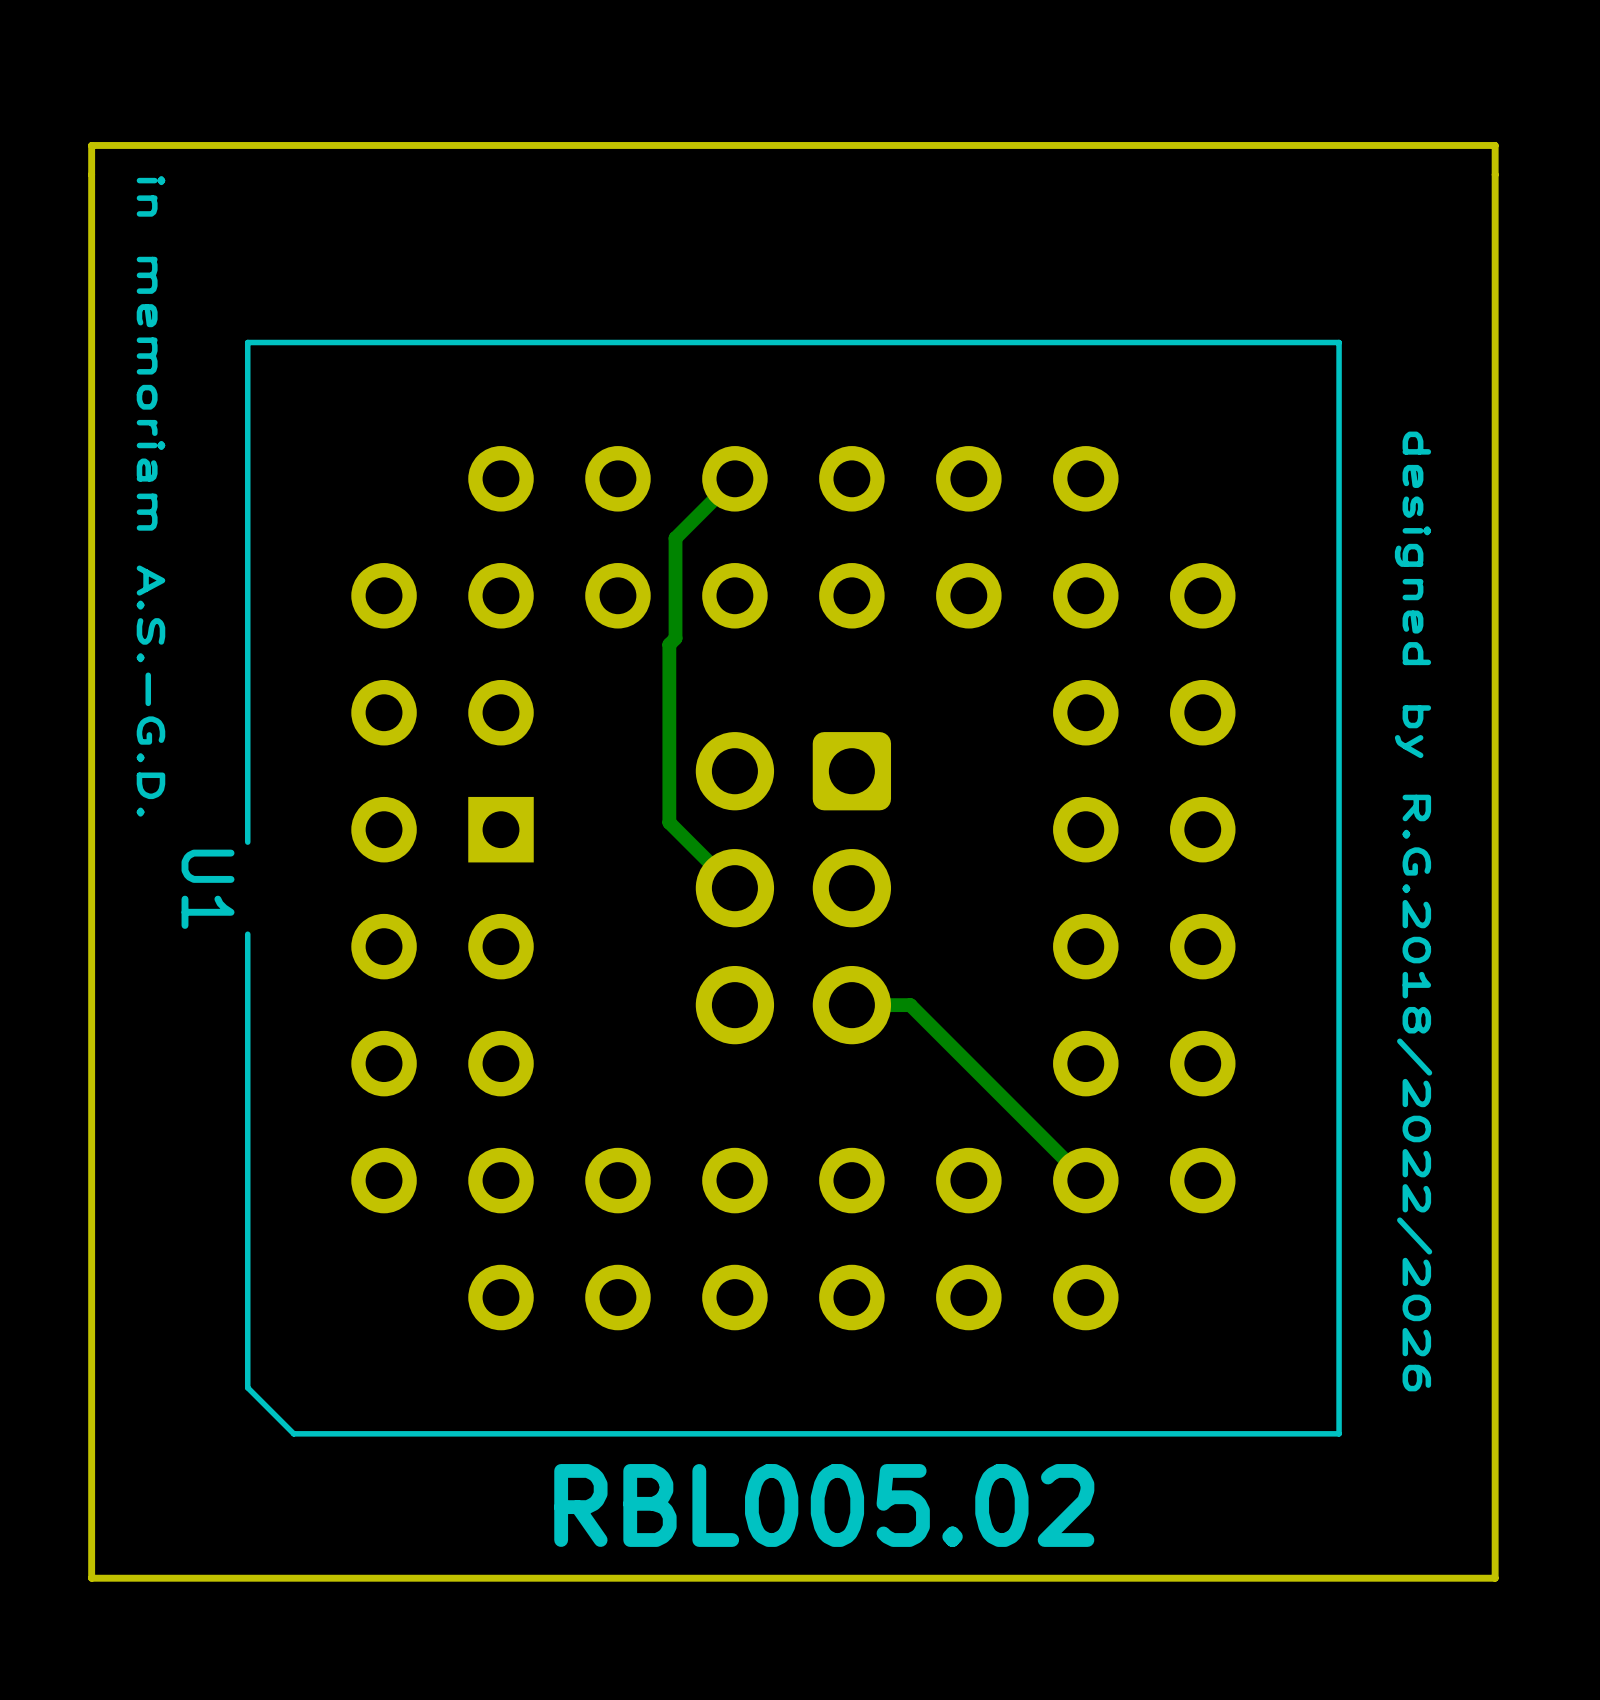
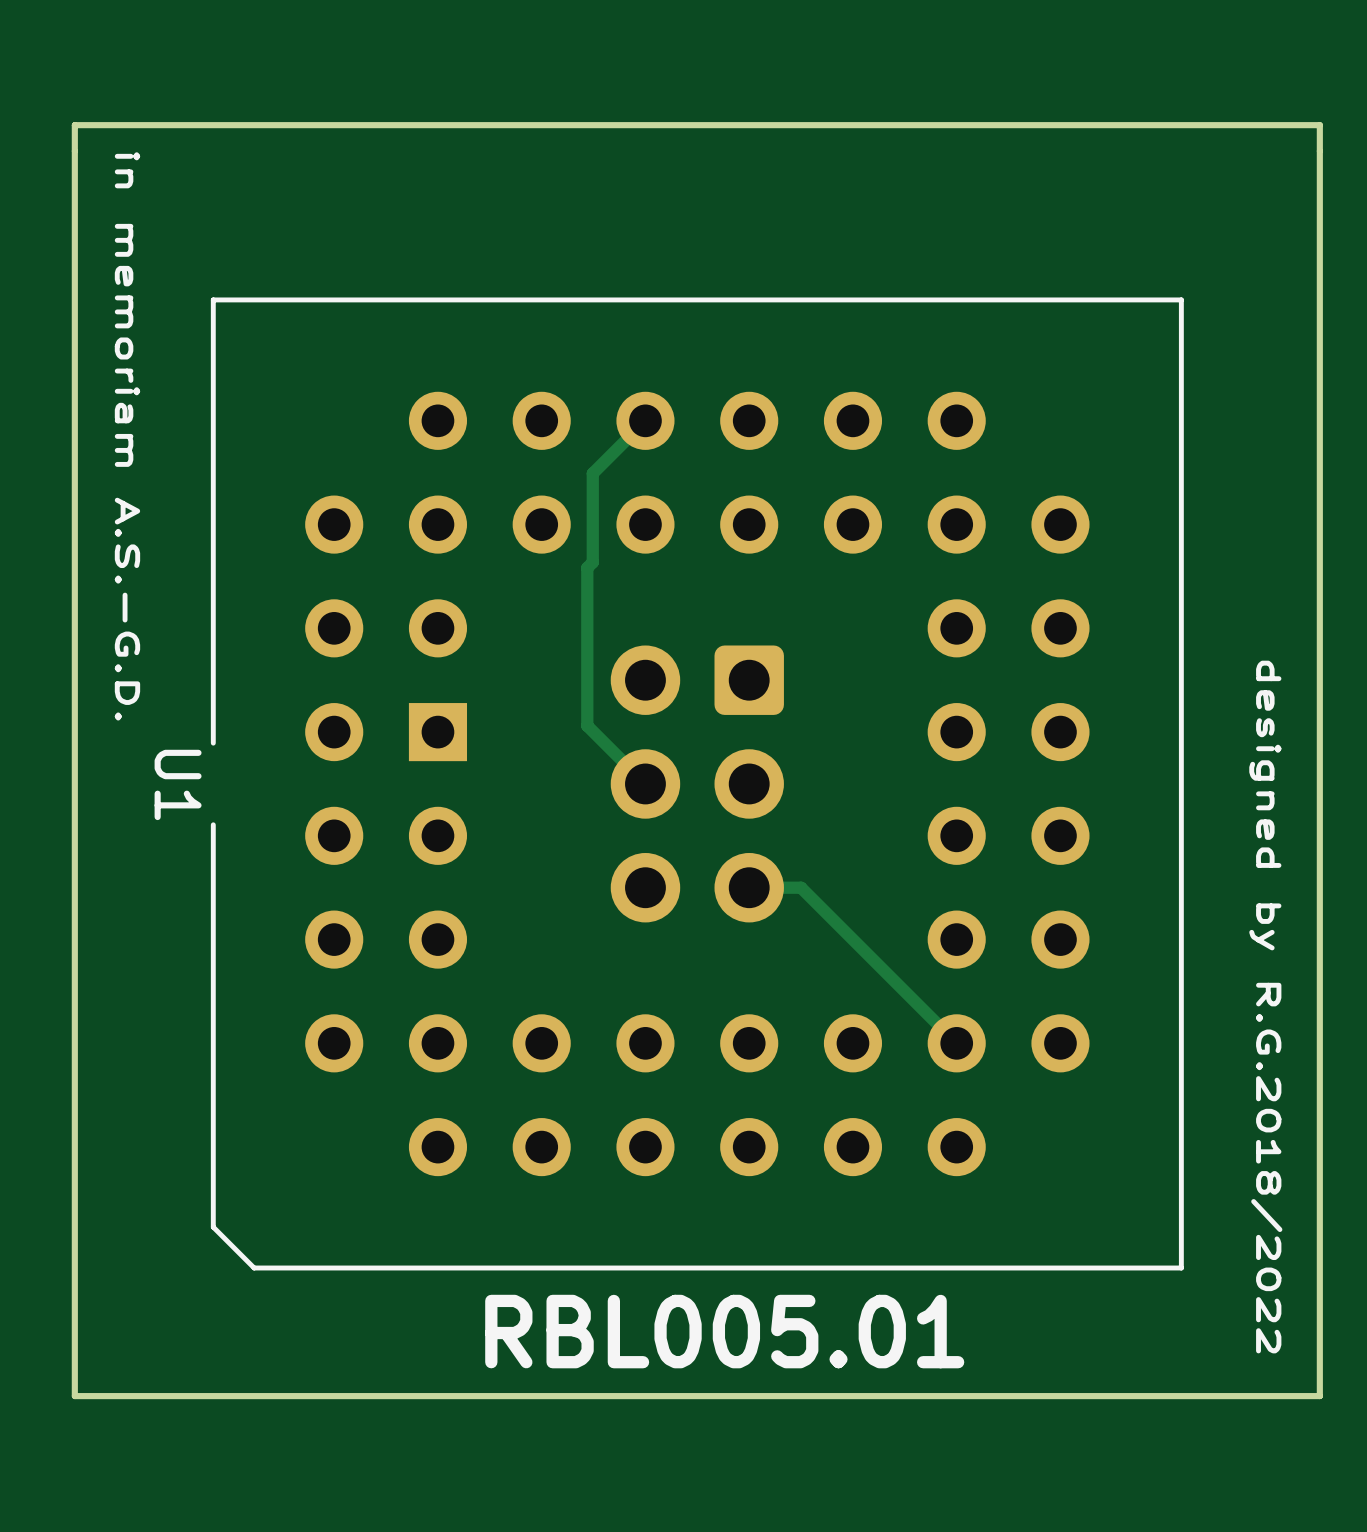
text: designed by R.G.2018/2022/2026 (1413, 911) -> designed by R.G.2018/2022 (1265, 1007)
text: RBL005.02 (824, 1505) -> RBL005.01 (724, 1331)

